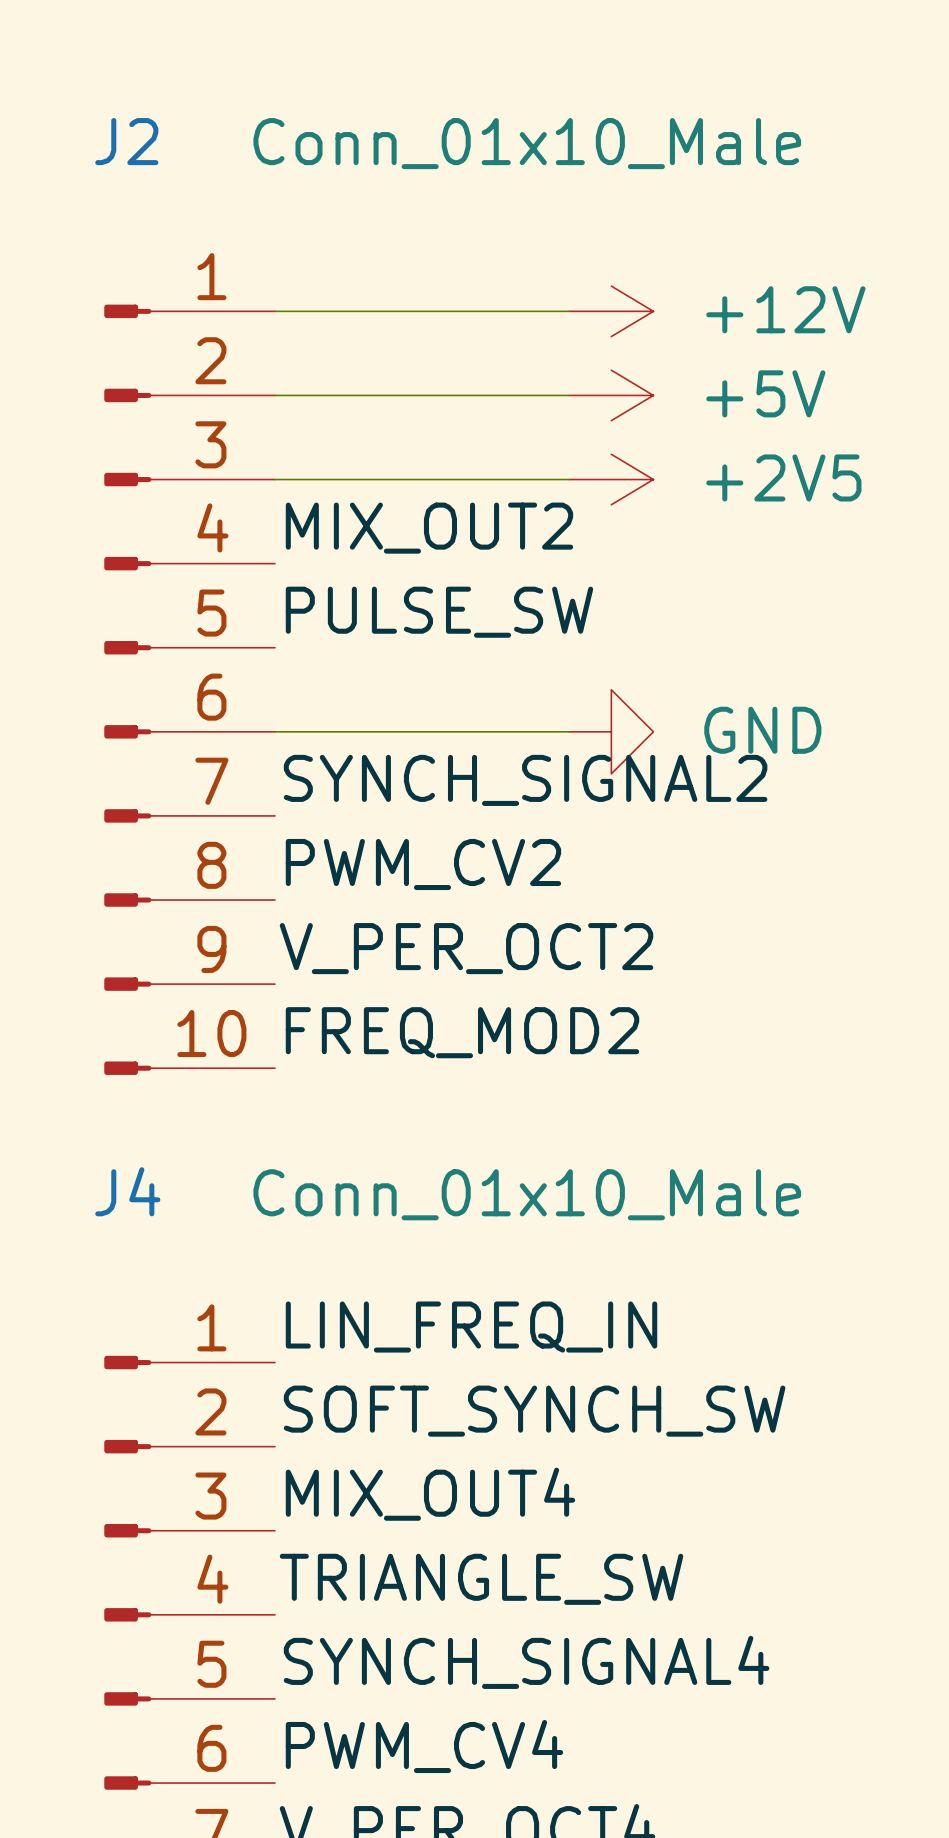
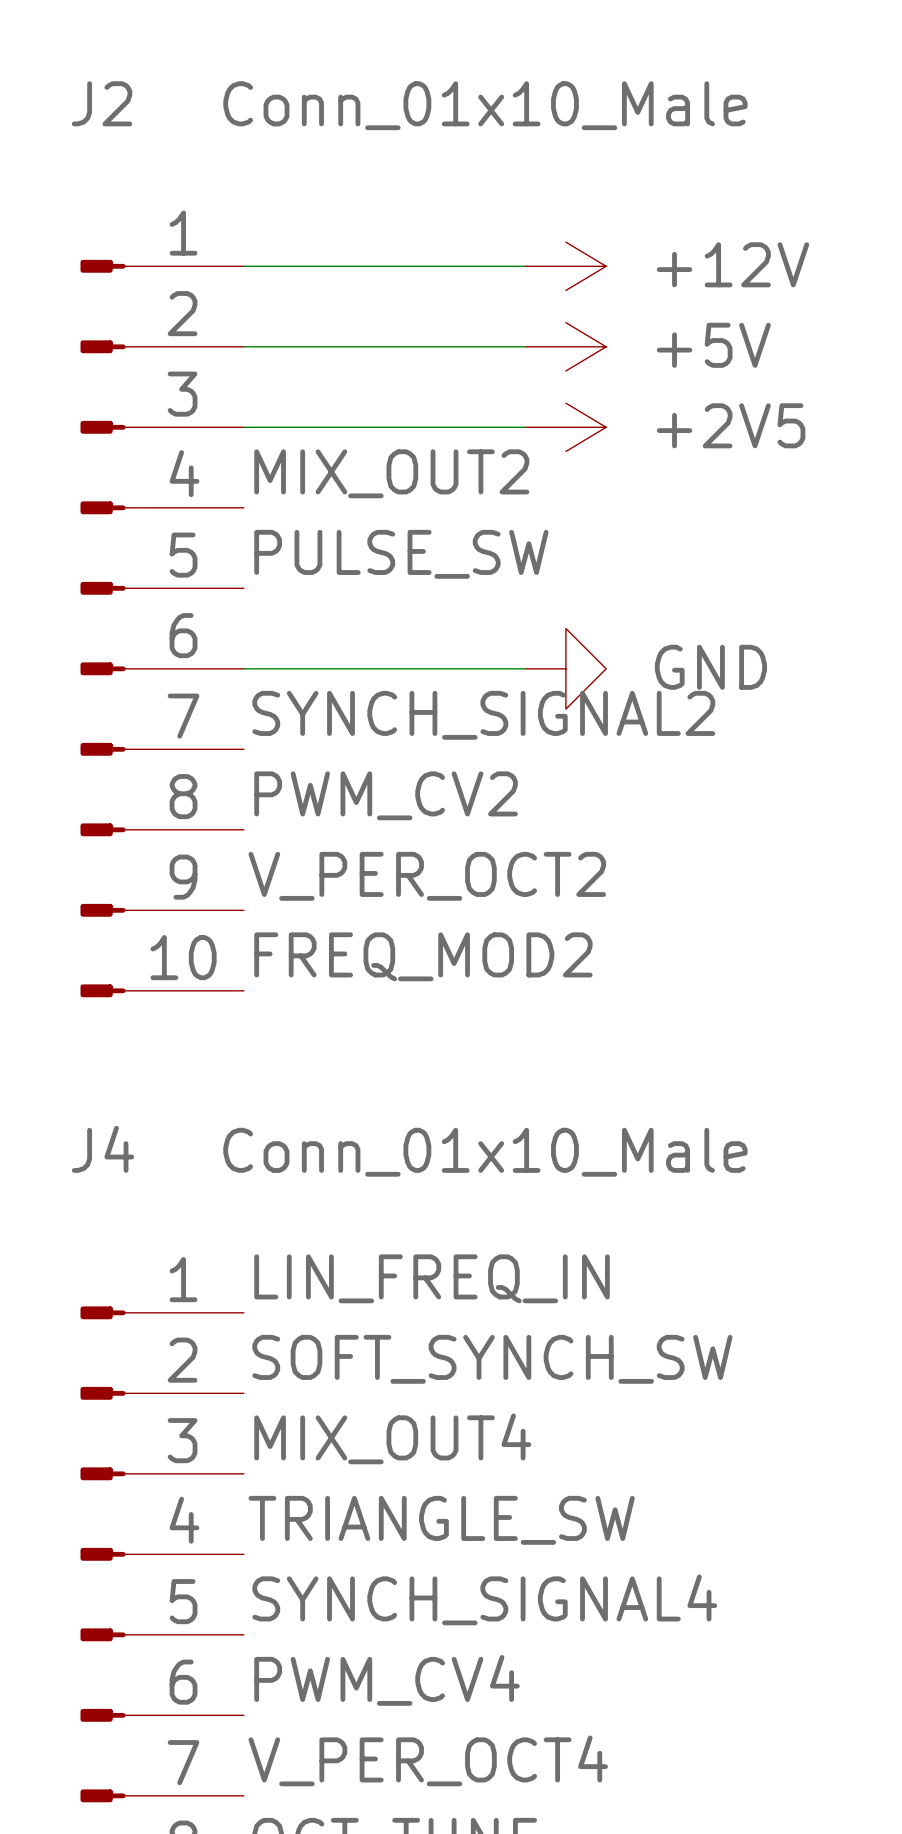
wire: (274, 311) (569, 311) -> (243, 266) (525, 266)
power symbol position: +12V (611, 311) -> +12V (565, 266)
wire: (274, 395) (569, 395) -> (243, 346) (525, 346)
power symbol position: +5V (611, 395) -> +5V (565, 346)
wire: (274, 479) (569, 479) -> (243, 427) (525, 427)
power symbol position: +2V5 (611, 479) -> +2V5 (565, 427)
label position: MIX_OUT2 (429, 528) -> MIX_OUT2 (391, 473)
label position: PULSE_SW (439, 612) -> PULSE_SW (401, 554)
J2 position: (189, 689) -> (162, 628)
wire: (274, 731) (569, 731) -> (243, 668) (525, 668)
power symbol position: GND (611, 731) -> GND (565, 668)
label position: SYNCH_SIGNAL2 (525, 780) -> SYNCH_SIGNAL2 (483, 715)
label position: PWM_CV2 (423, 864) -> PWM_CV2 (386, 795)
label position: V_PER_OCT2 (466, 948) -> V_PER_OCT2 (427, 876)
label position: FREQ_MOD2 (462, 1032) -> FREQ_MOD2 (423, 956)

